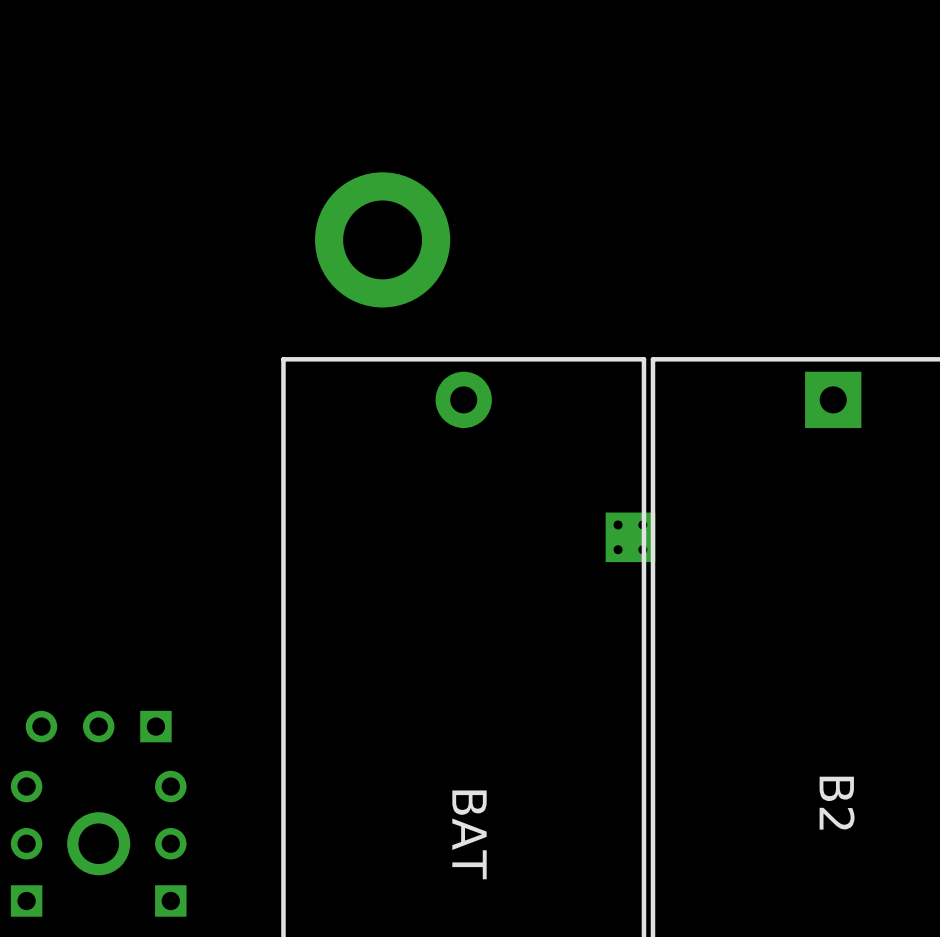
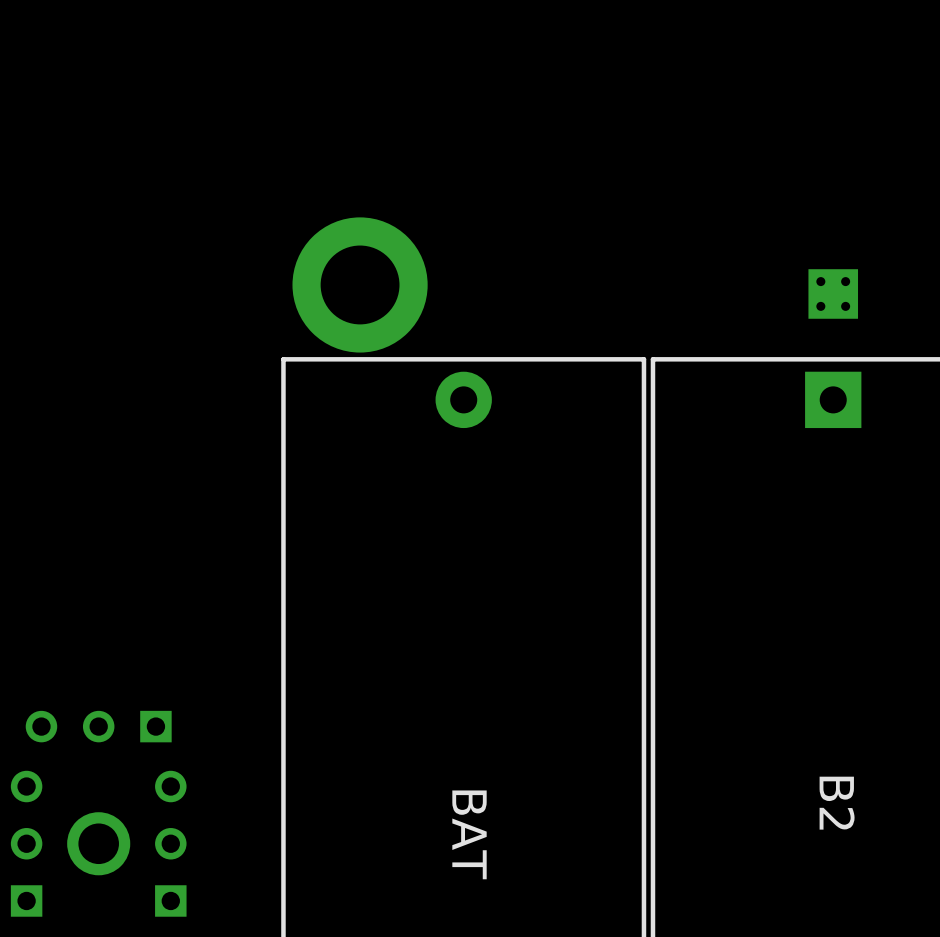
part position: (382, 239) -> (360, 284)
part position: (630, 537) -> (833, 293)

